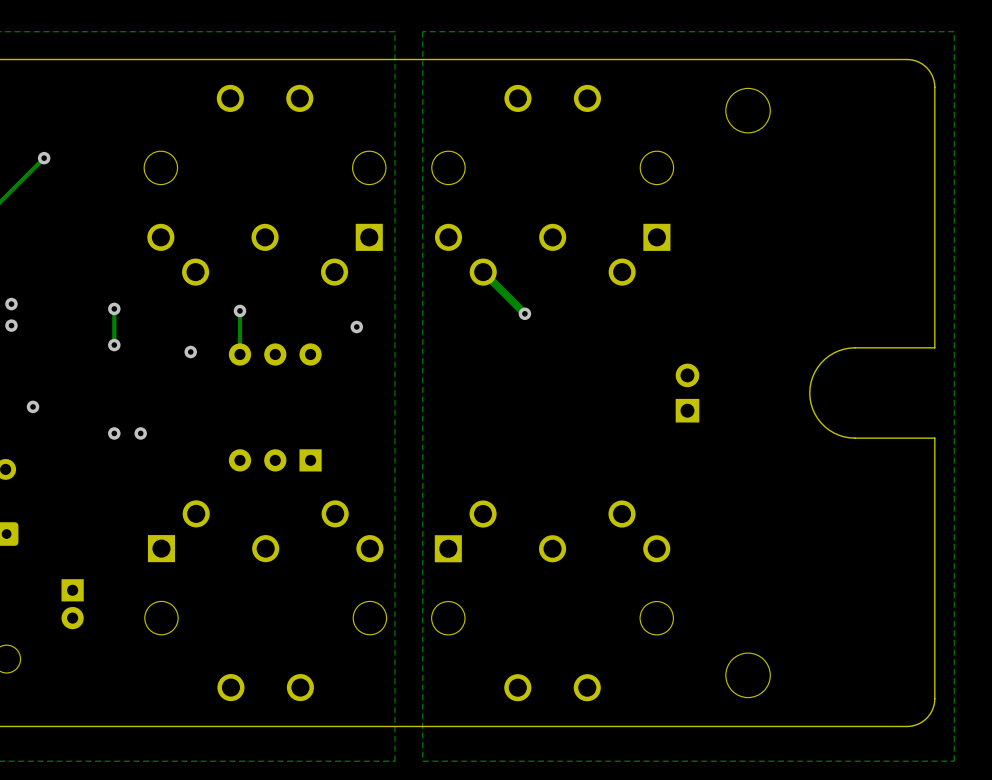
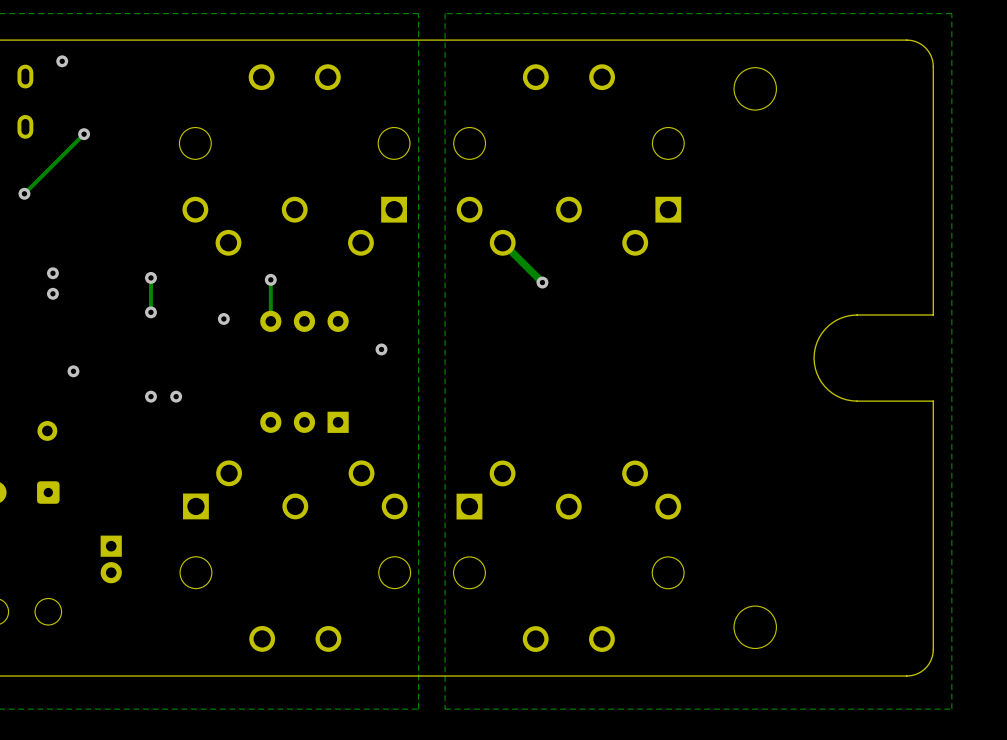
via: none -> (62, 61)
via position: (356, 326) -> (381, 349)
part: (687, 393) -> none

